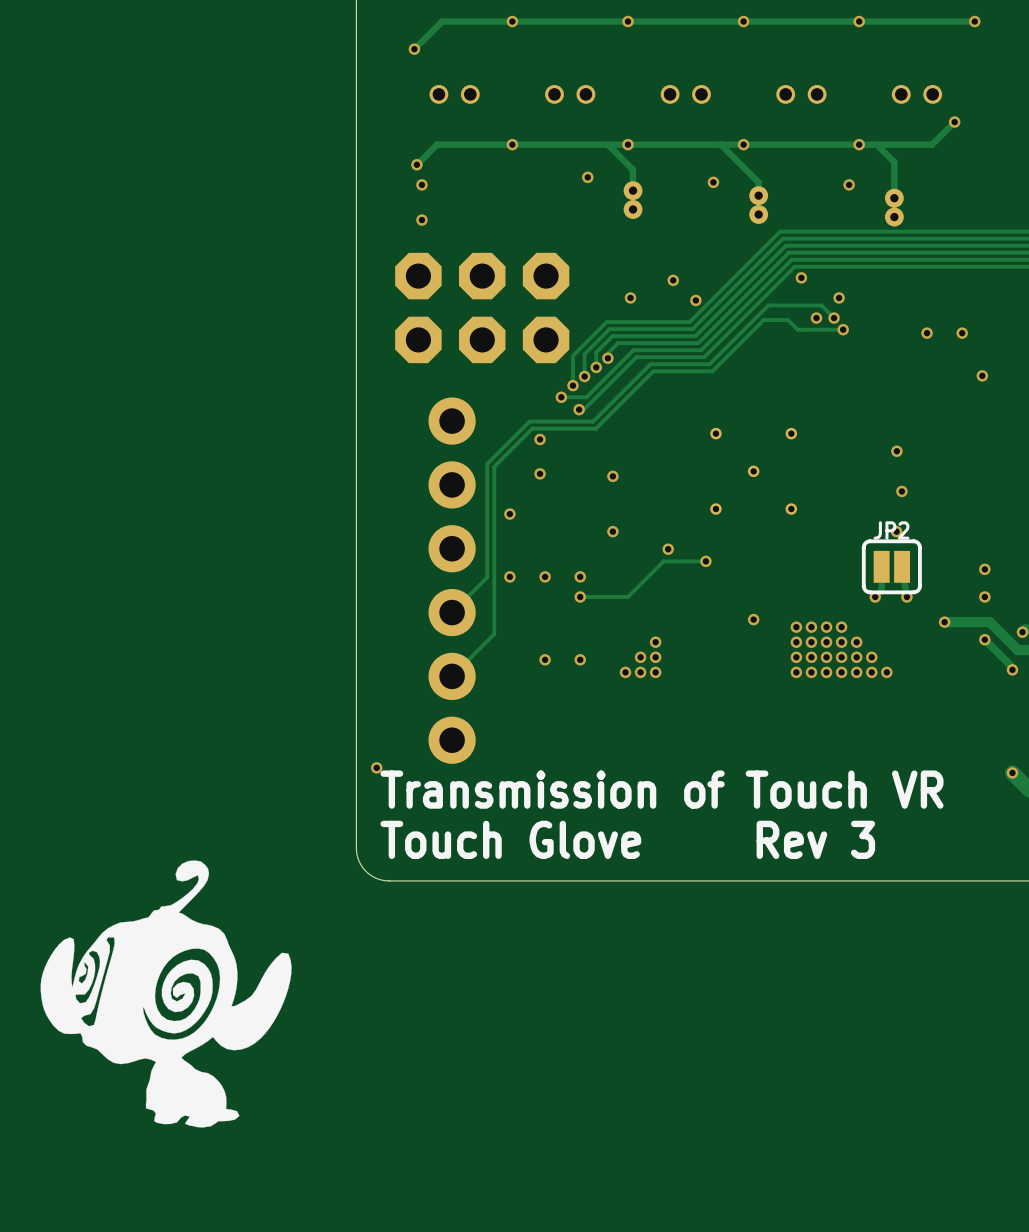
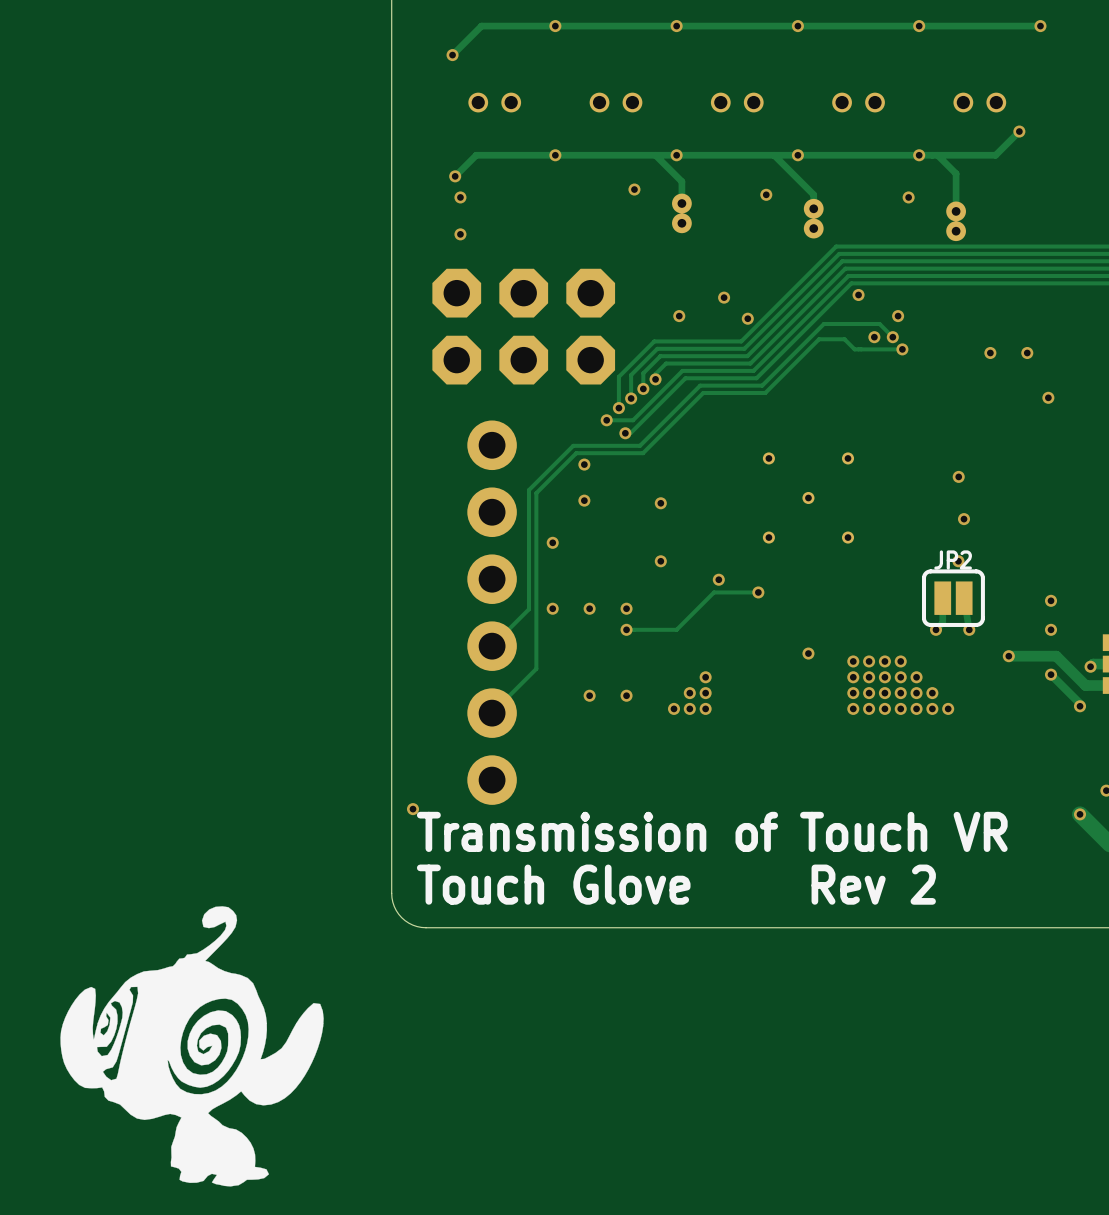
text: Touch Glove Rev 3 (627, 839) -> Touch Glove Rev 2 (676, 884)

